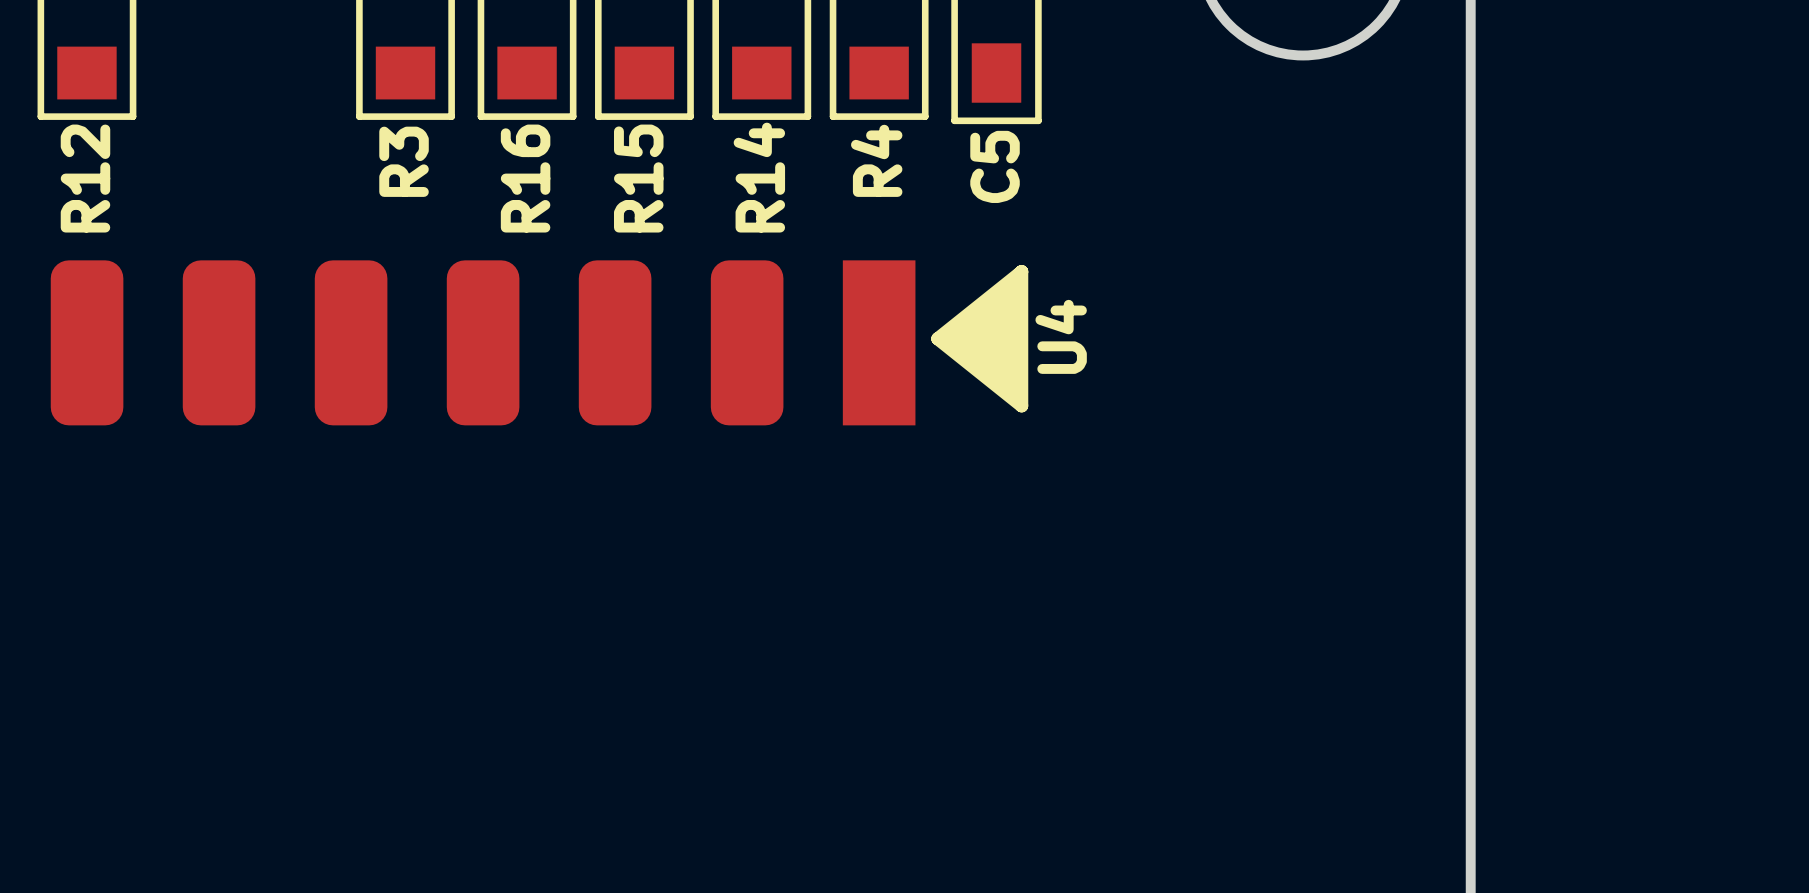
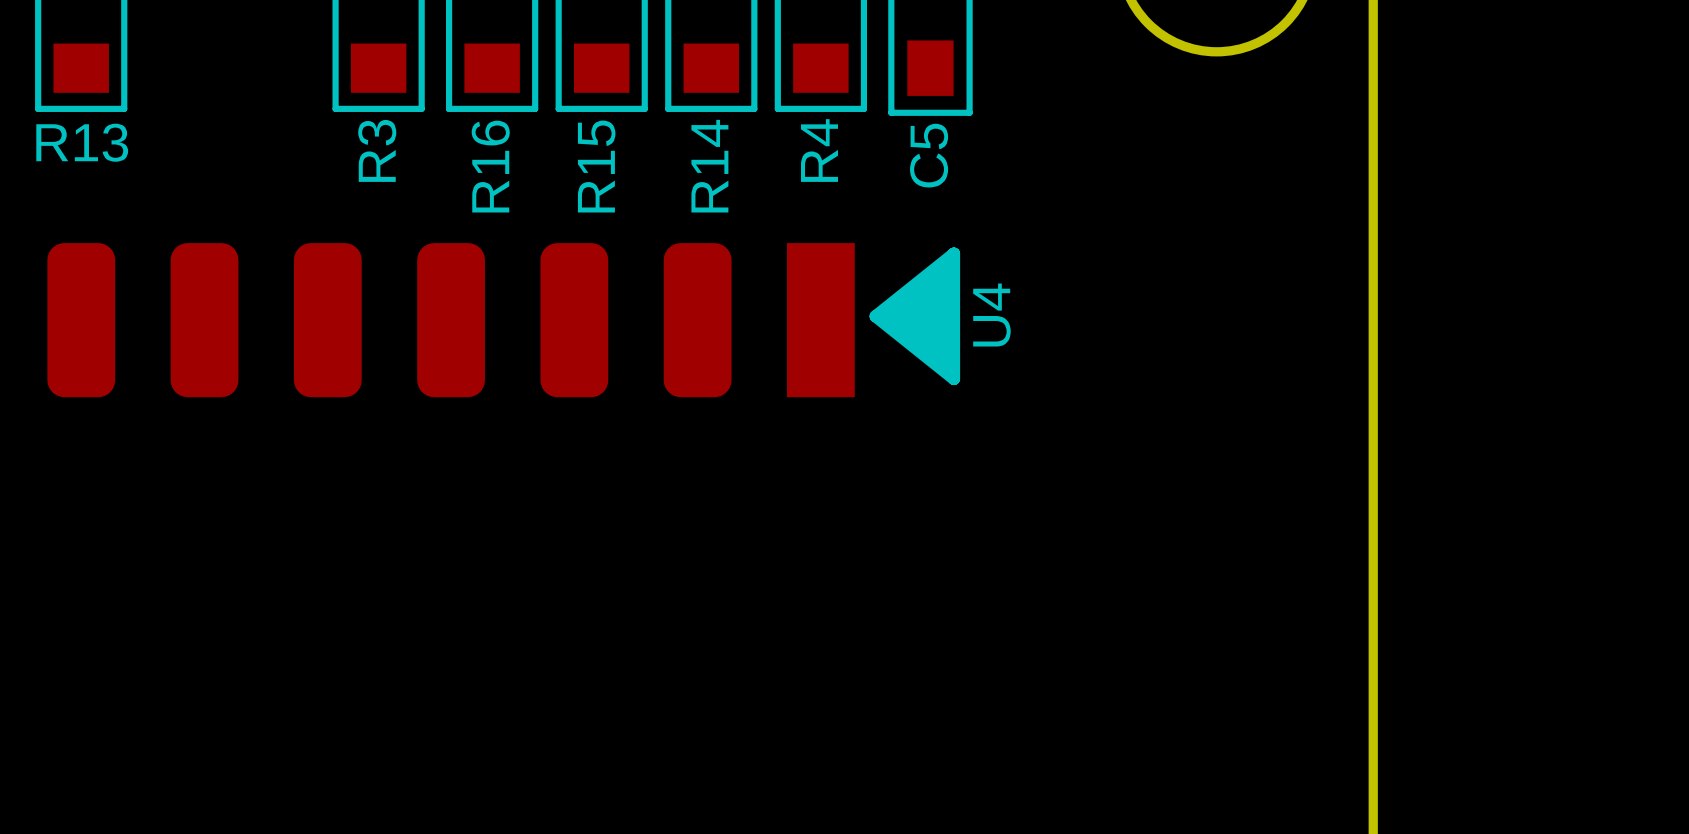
R12 name: R12 (85, 178) -> R13 (82, 142)

